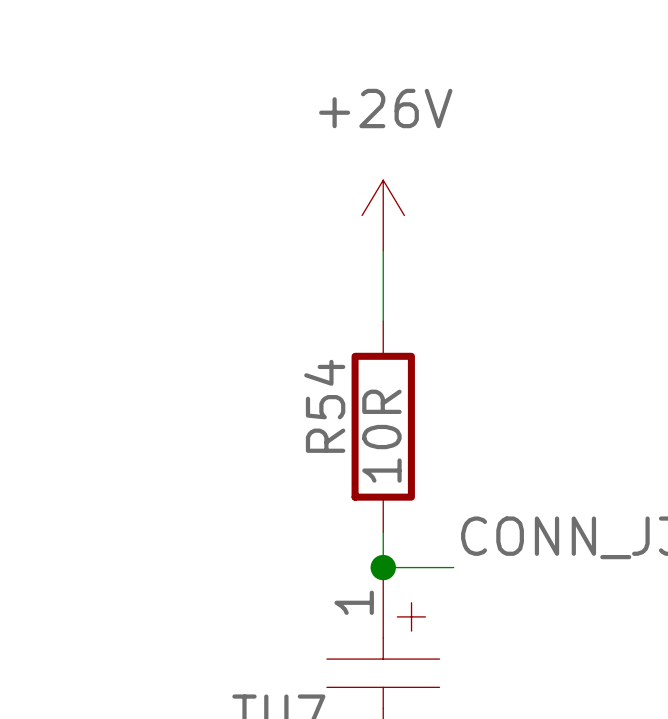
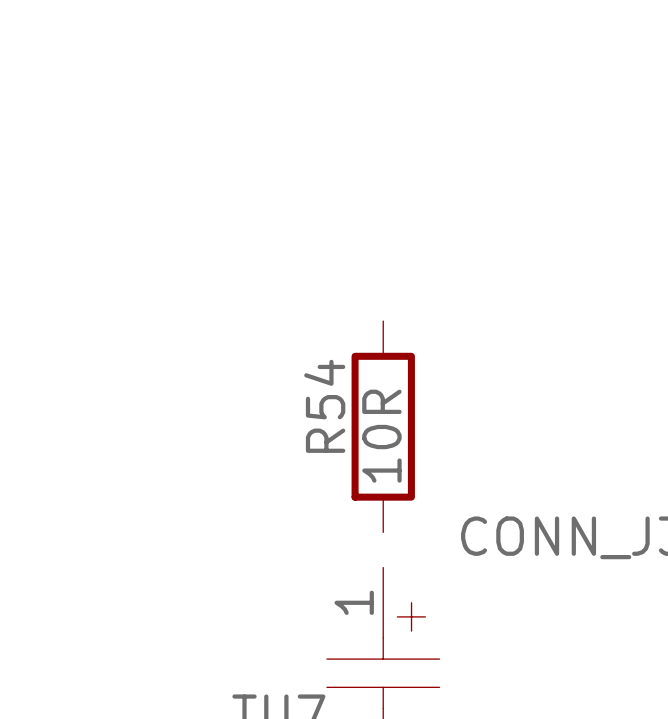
power symbol: +26V (383, 215) -> none
wire: (383, 250) (383, 321) -> none
wire: (383, 532) (383, 567) (453, 567) -> none
junction: (383, 567) -> none

